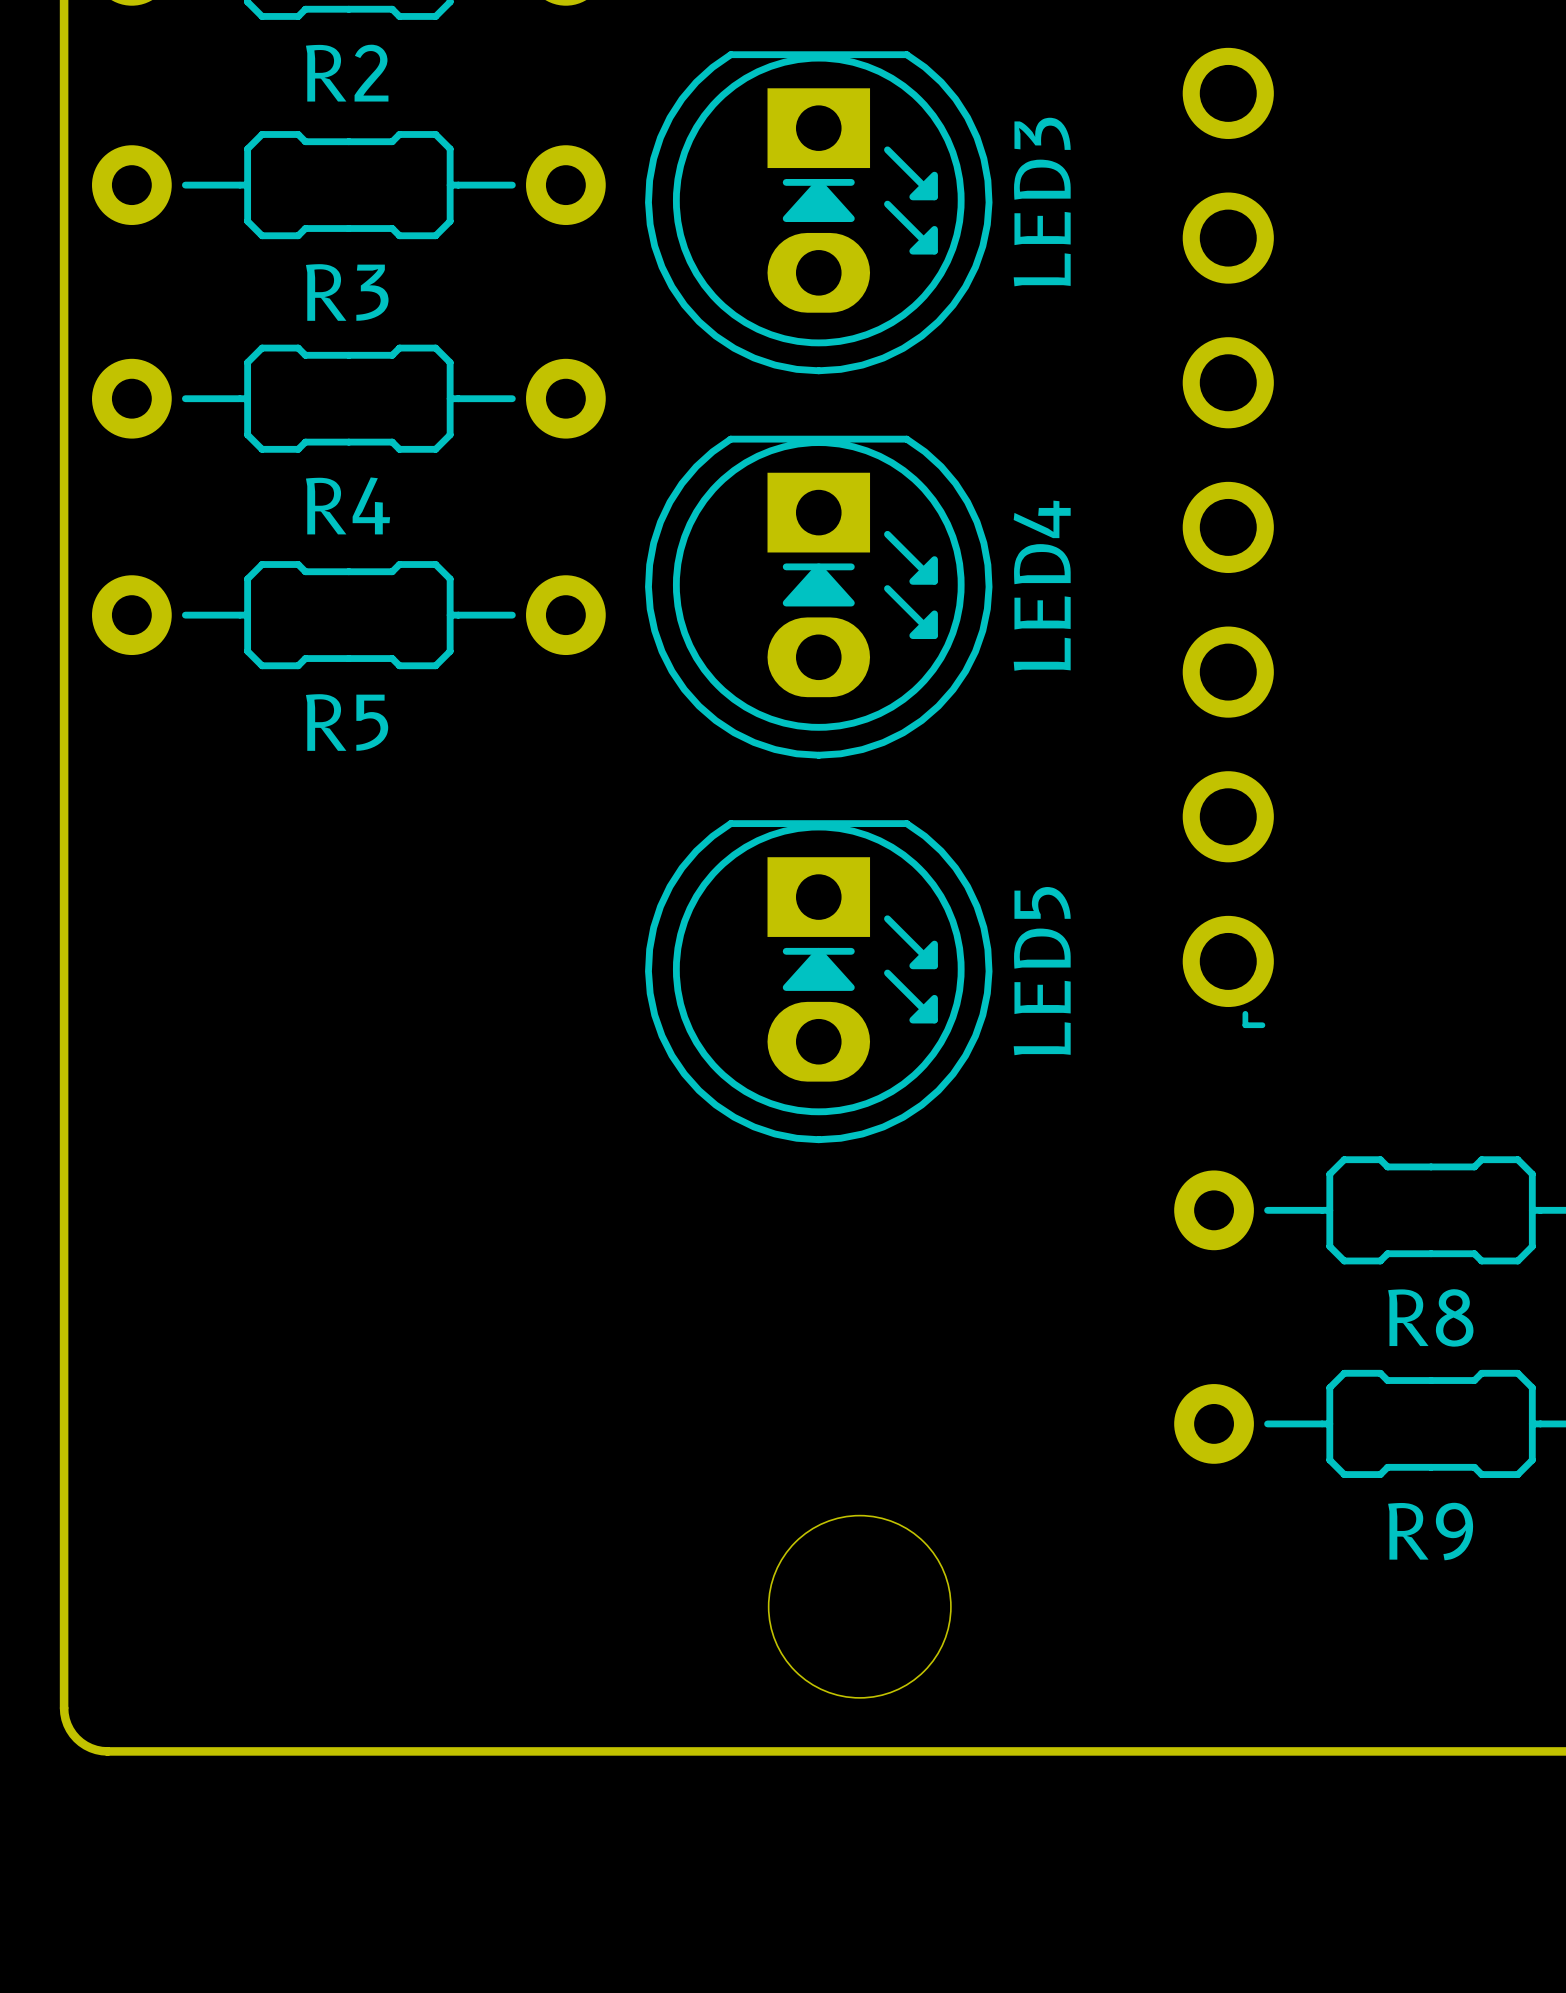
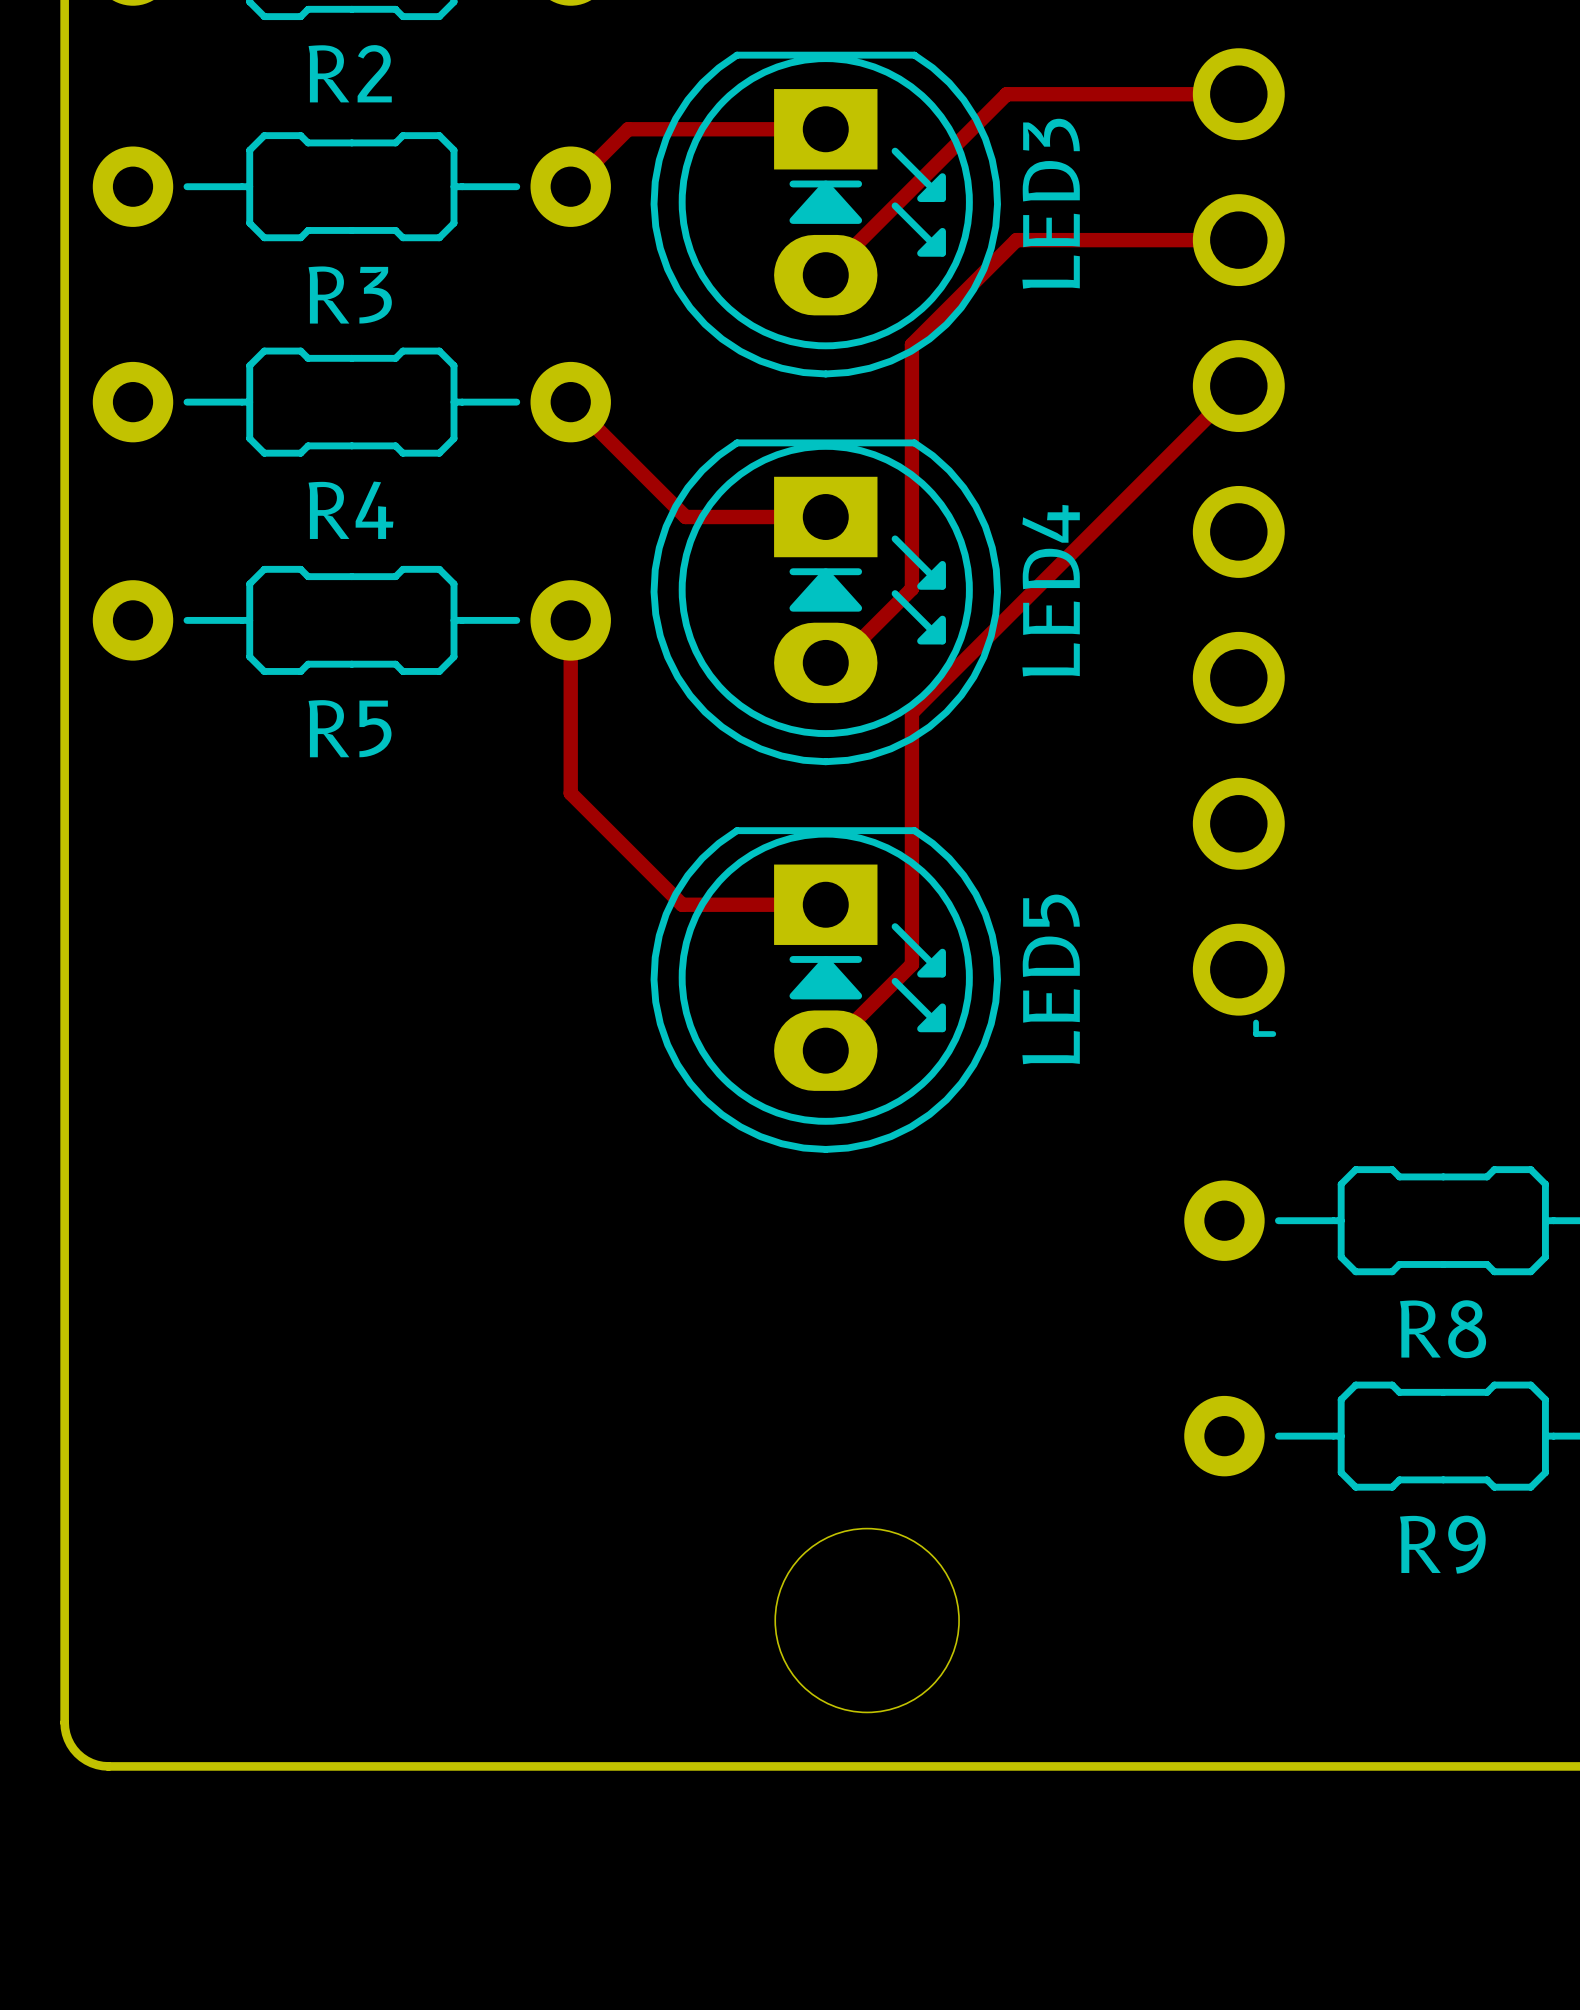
top track: none -> (1238, 94) (1006, 94) (825, 275)
top track: none -> (825, 129) (628, 129) (570, 186)
top track: none -> (1238, 240) (1016, 240) (911, 344) (911, 588) (837, 662) (825, 662)
top track: none -> (1238, 386) (911, 712) (911, 964) (825, 1050)
top track: none -> (570, 402) (685, 517) (825, 517)
top track: none -> (570, 620) (570, 793) (682, 904) (825, 904)

